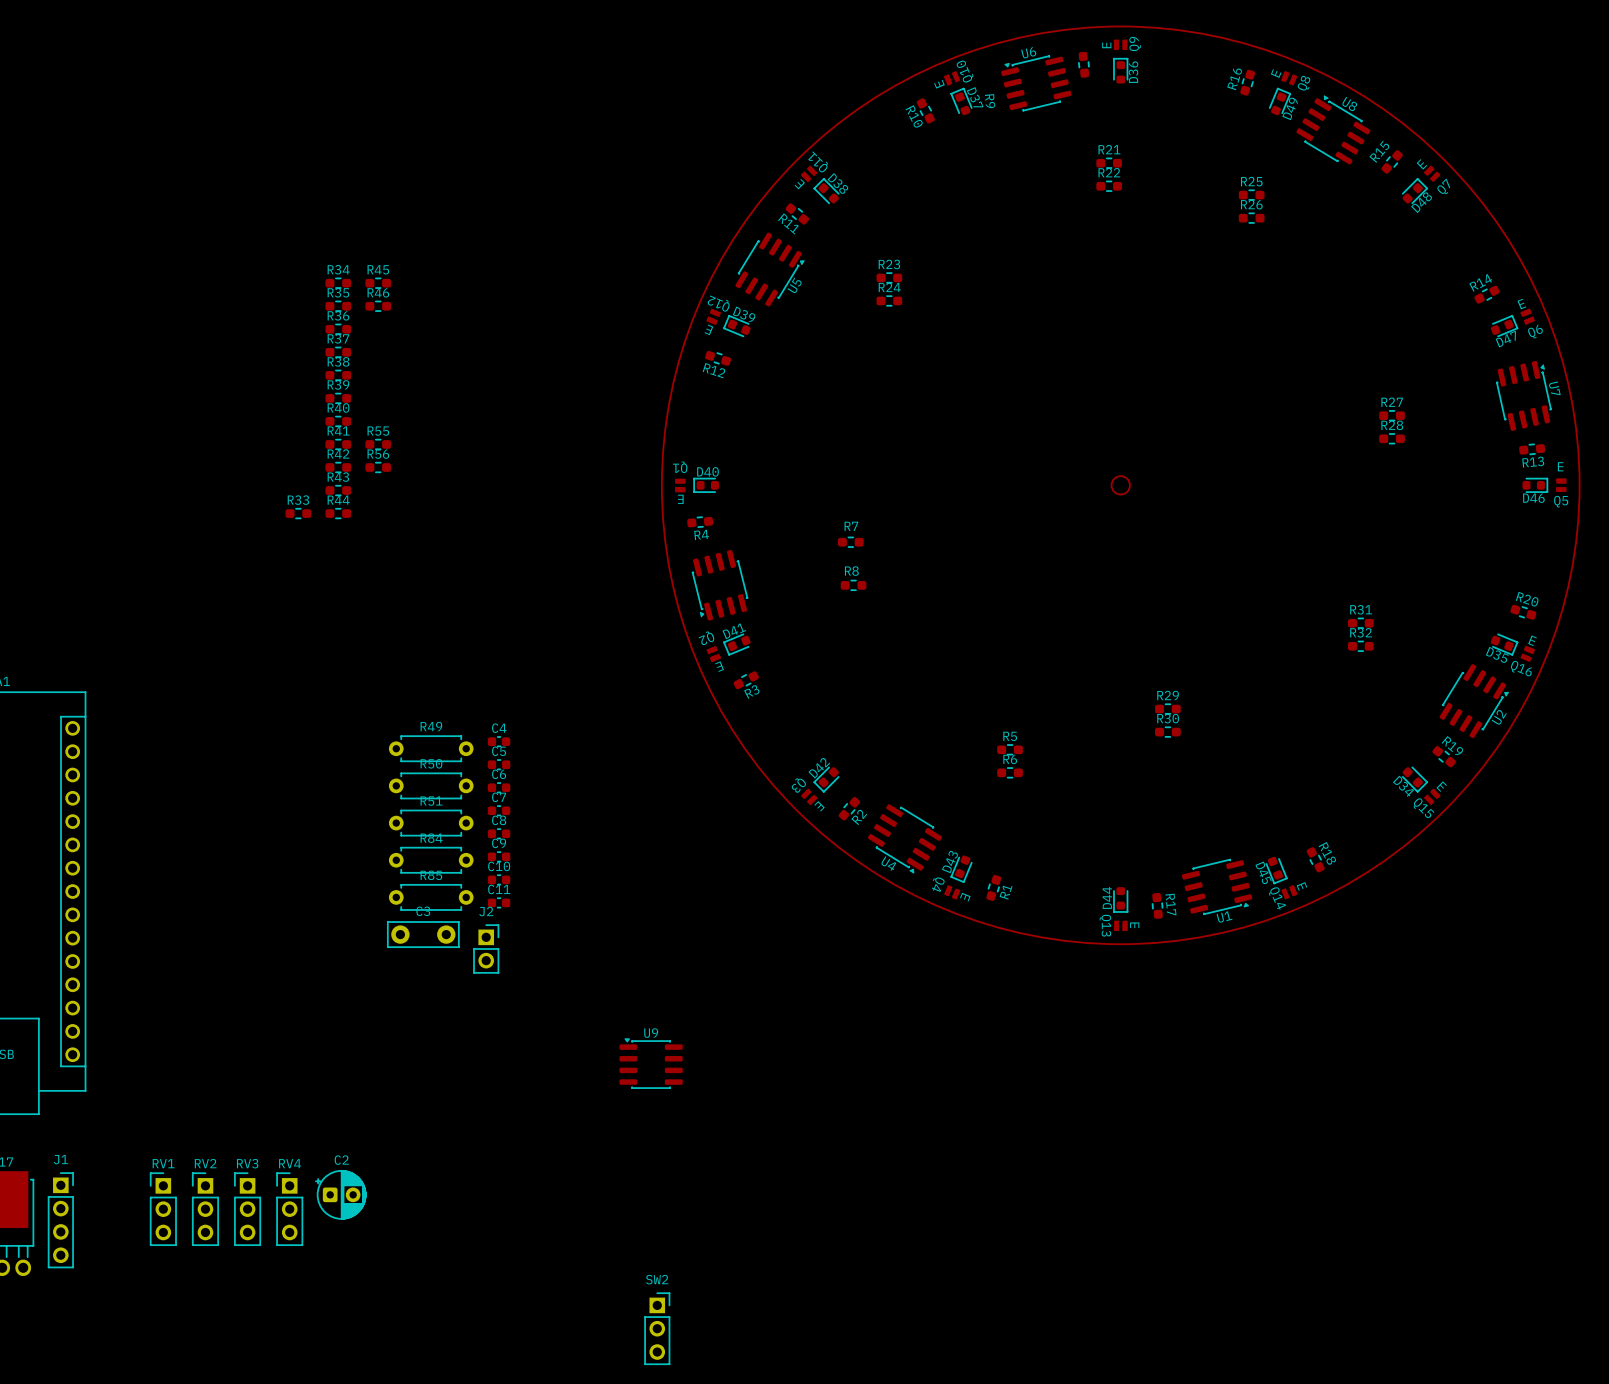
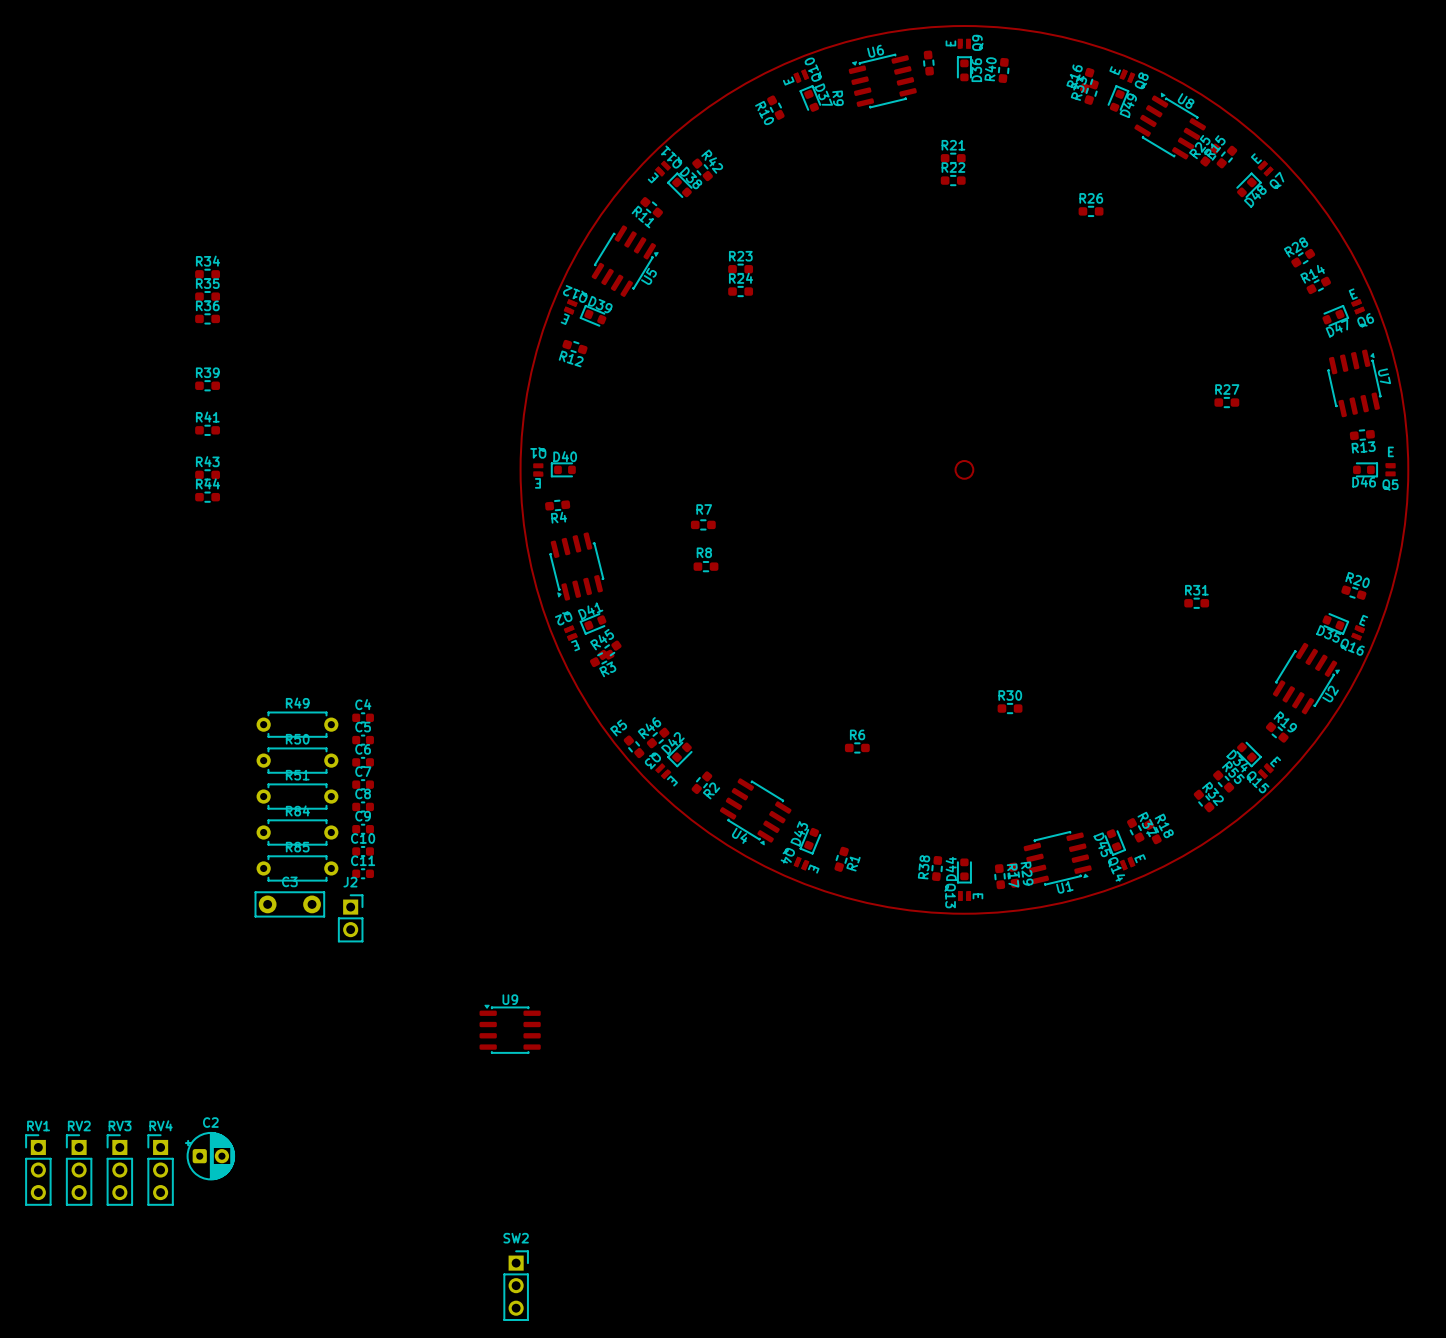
R25 rotation: 0° (1251, 195) -> 52° counterclockwise (1210, 155)
R25 position: (1251, 195) -> (1210, 155)
R45 rotation: 0° (378, 283) -> 35° counterclockwise (609, 650)
R45 position: (378, 283) -> (609, 650)
R46 rotation: 0° (378, 306) -> 40° counterclockwise (658, 737)
R46 position: (378, 306) -> (658, 737)
R37 rotation: 0° (338, 352) -> 62.5° clockwise (1135, 830)
R37 position: (338, 352) -> (1135, 830)
R38 rotation: 0° (338, 375) -> 85° counterclockwise (937, 868)
R38 position: (338, 375) -> (937, 868)
R40 rotation: 0° (338, 421) -> 85° counterclockwise (1003, 70)
R40 position: (338, 421) -> (1003, 70)
R28 rotation: 0° (1392, 438) -> 32° counterclockwise (1303, 258)
R28 position: (1392, 438) -> (1303, 258)
R55 rotation: 0° (378, 444) -> 48° clockwise (1223, 781)
R55 position: (378, 444) -> (1223, 781)
R42 rotation: 0° (338, 467) -> 50° clockwise (702, 169)
R42 position: (338, 467) -> (702, 169)
R56: (378, 467) -> none
R33 rotation: 0° (298, 513) -> 72.5° counterclockwise (1091, 92)
R33 position: (298, 513) -> (1091, 92)
R32 rotation: 0° (1360, 646) -> 50° clockwise (1204, 800)
R32 position: (1360, 646) -> (1204, 800)
R29 rotation: 0° (1167, 709) -> 83° clockwise (1014, 875)
R29 position: (1167, 709) -> (1014, 875)
R5 rotation: 0° (1010, 749) -> 50° clockwise (634, 746)
R5 position: (1010, 749) -> (634, 746)

